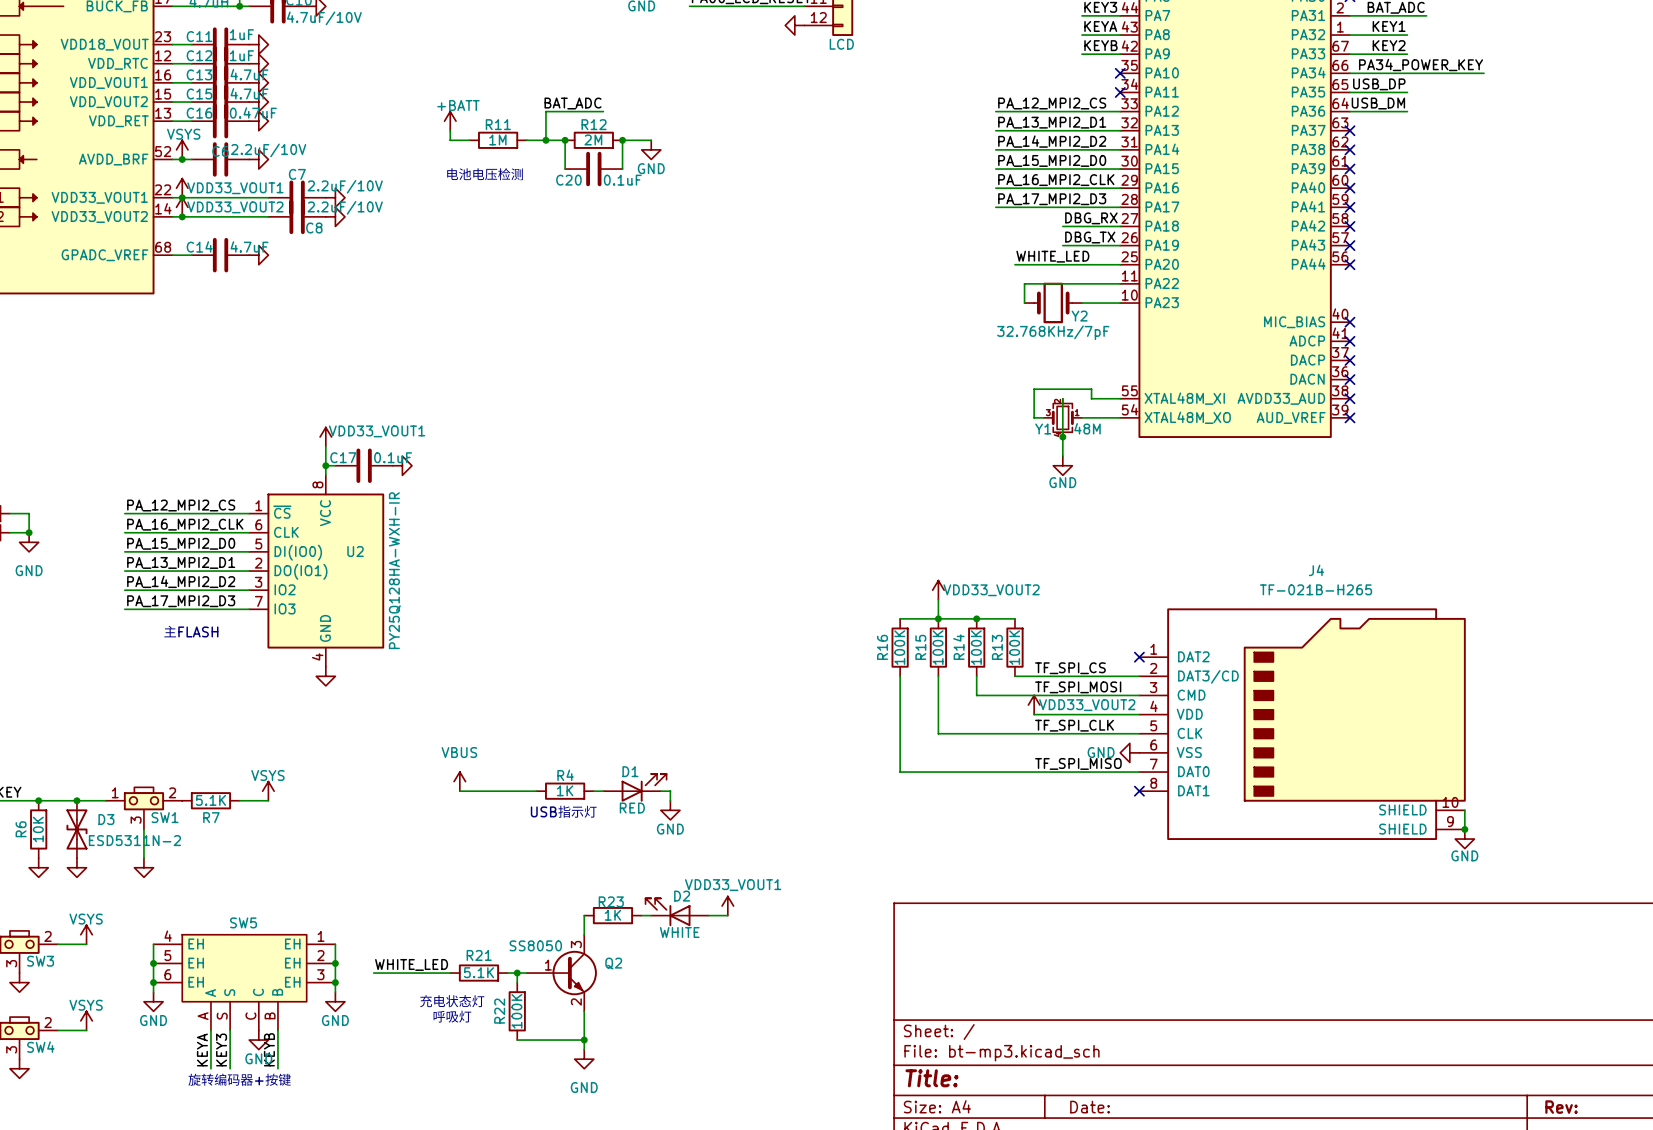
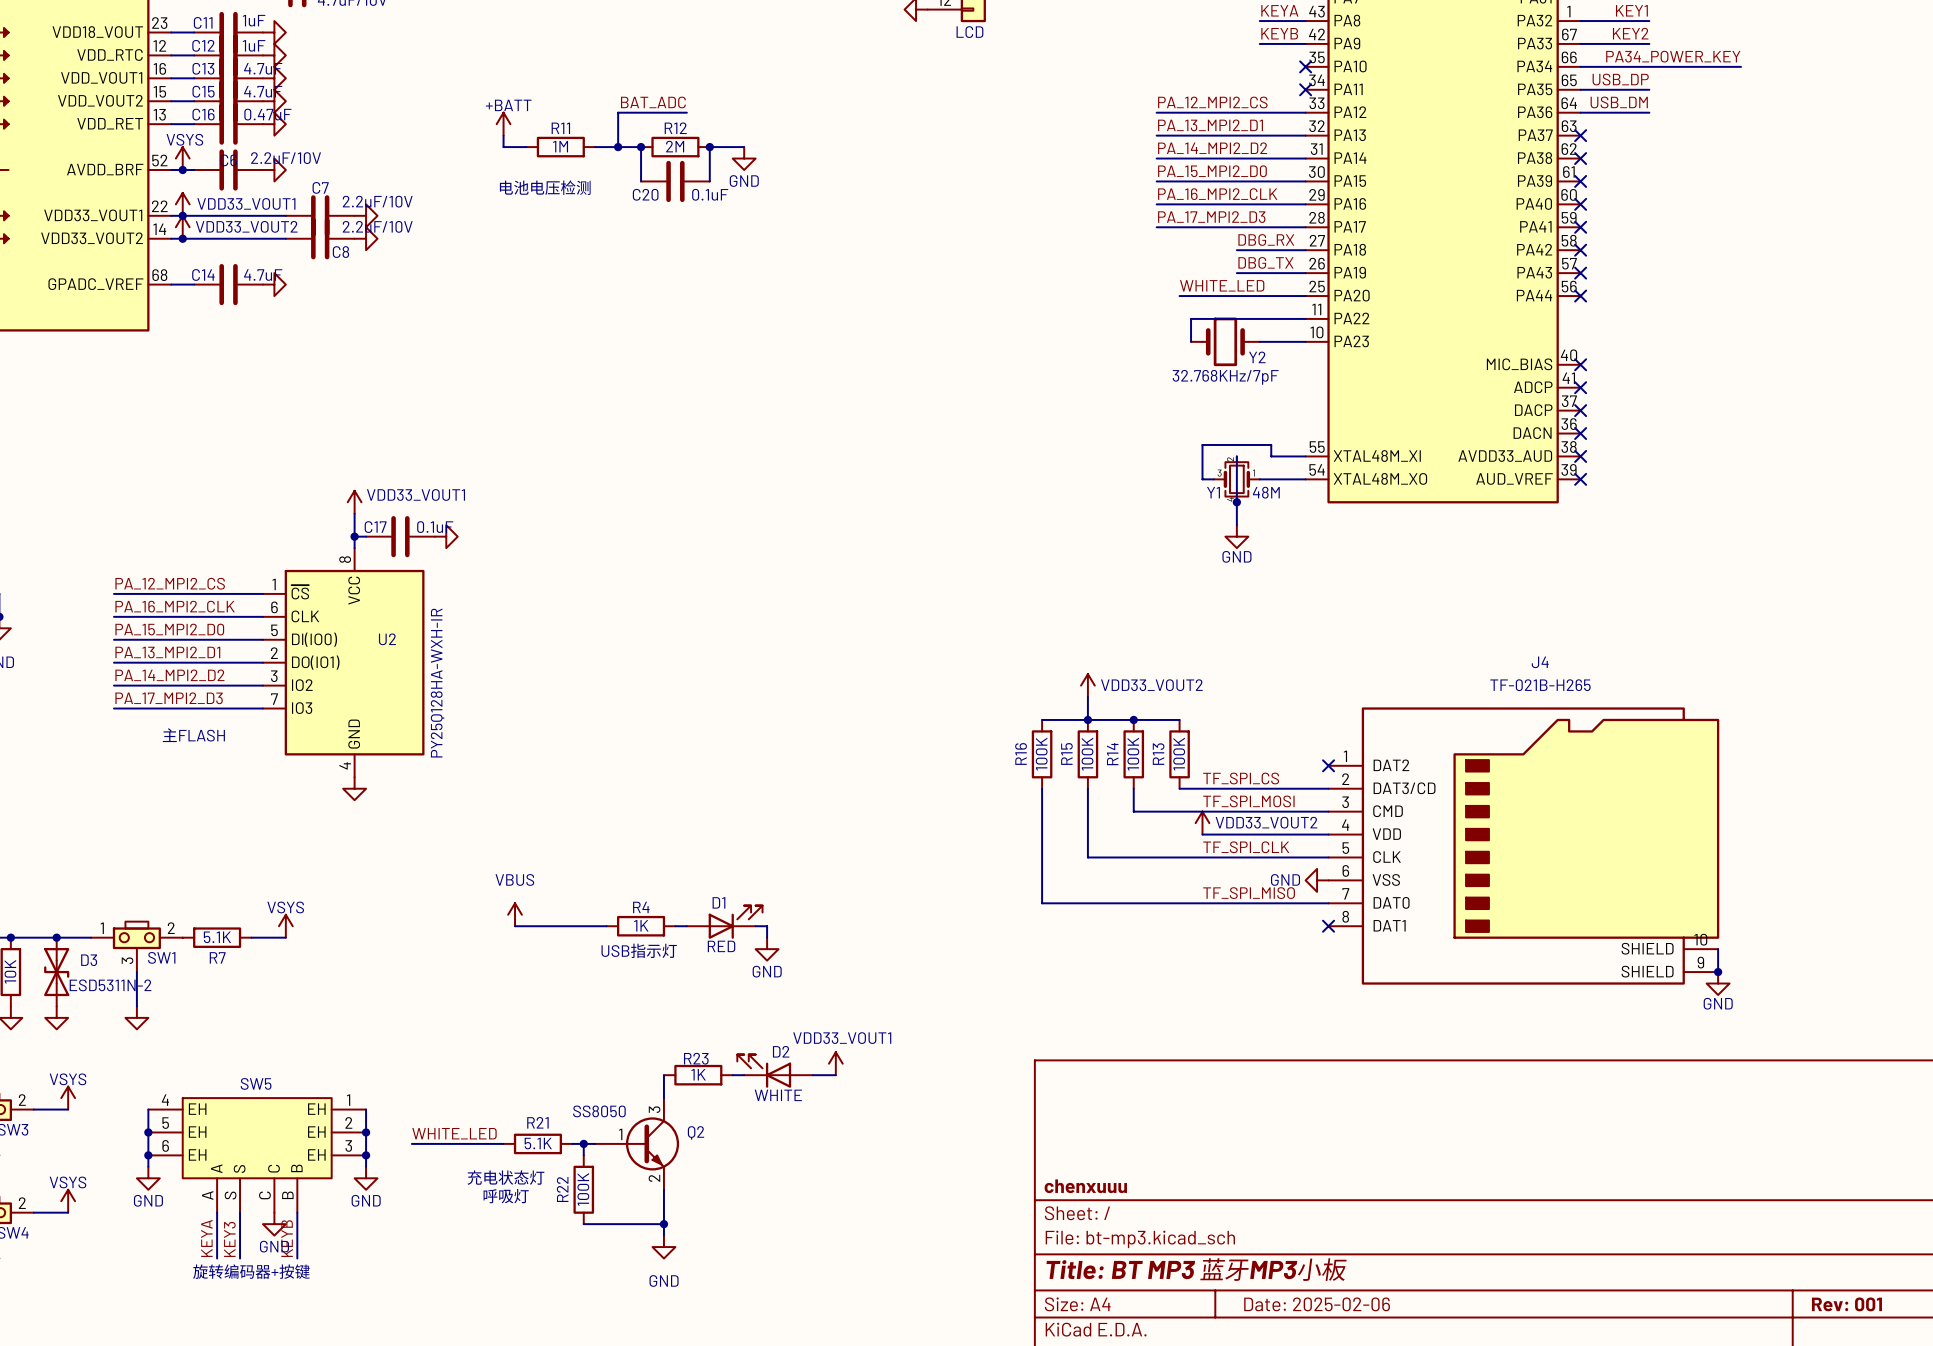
title block: none -> chenxuuu (1085, 1186)
title block: Title: (932, 1078) -> Title: BT MP3 蓝牙MP3小板 (1196, 1269)
title block: Date: (1089, 1107) -> Date: 2025-02-06 (1317, 1304)
title block: Rev: (1561, 1107) -> Rev: 001 (1846, 1304)

